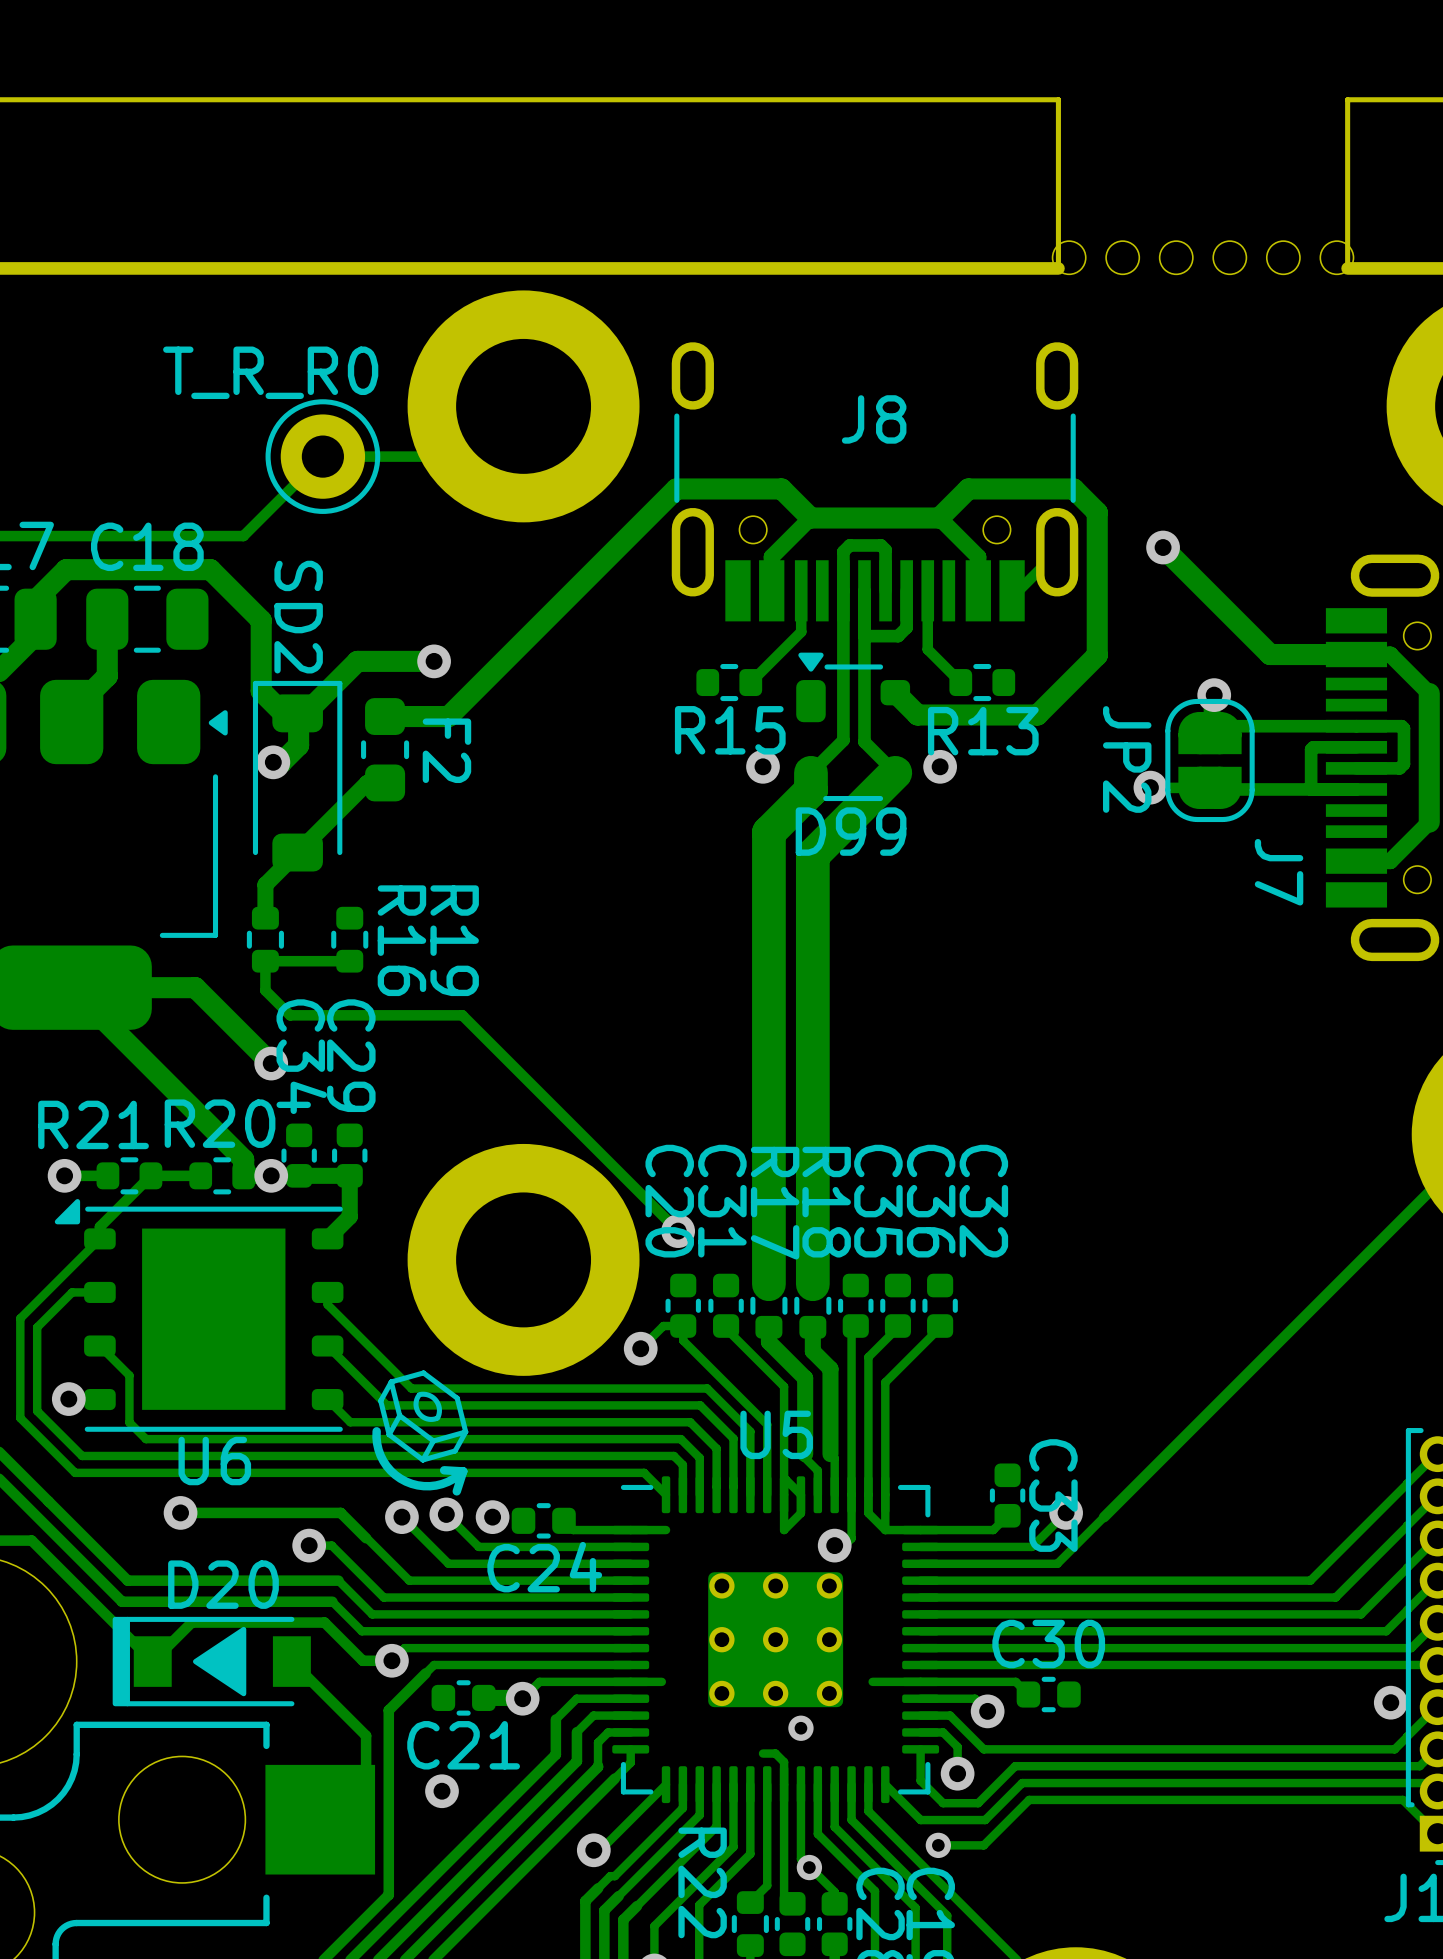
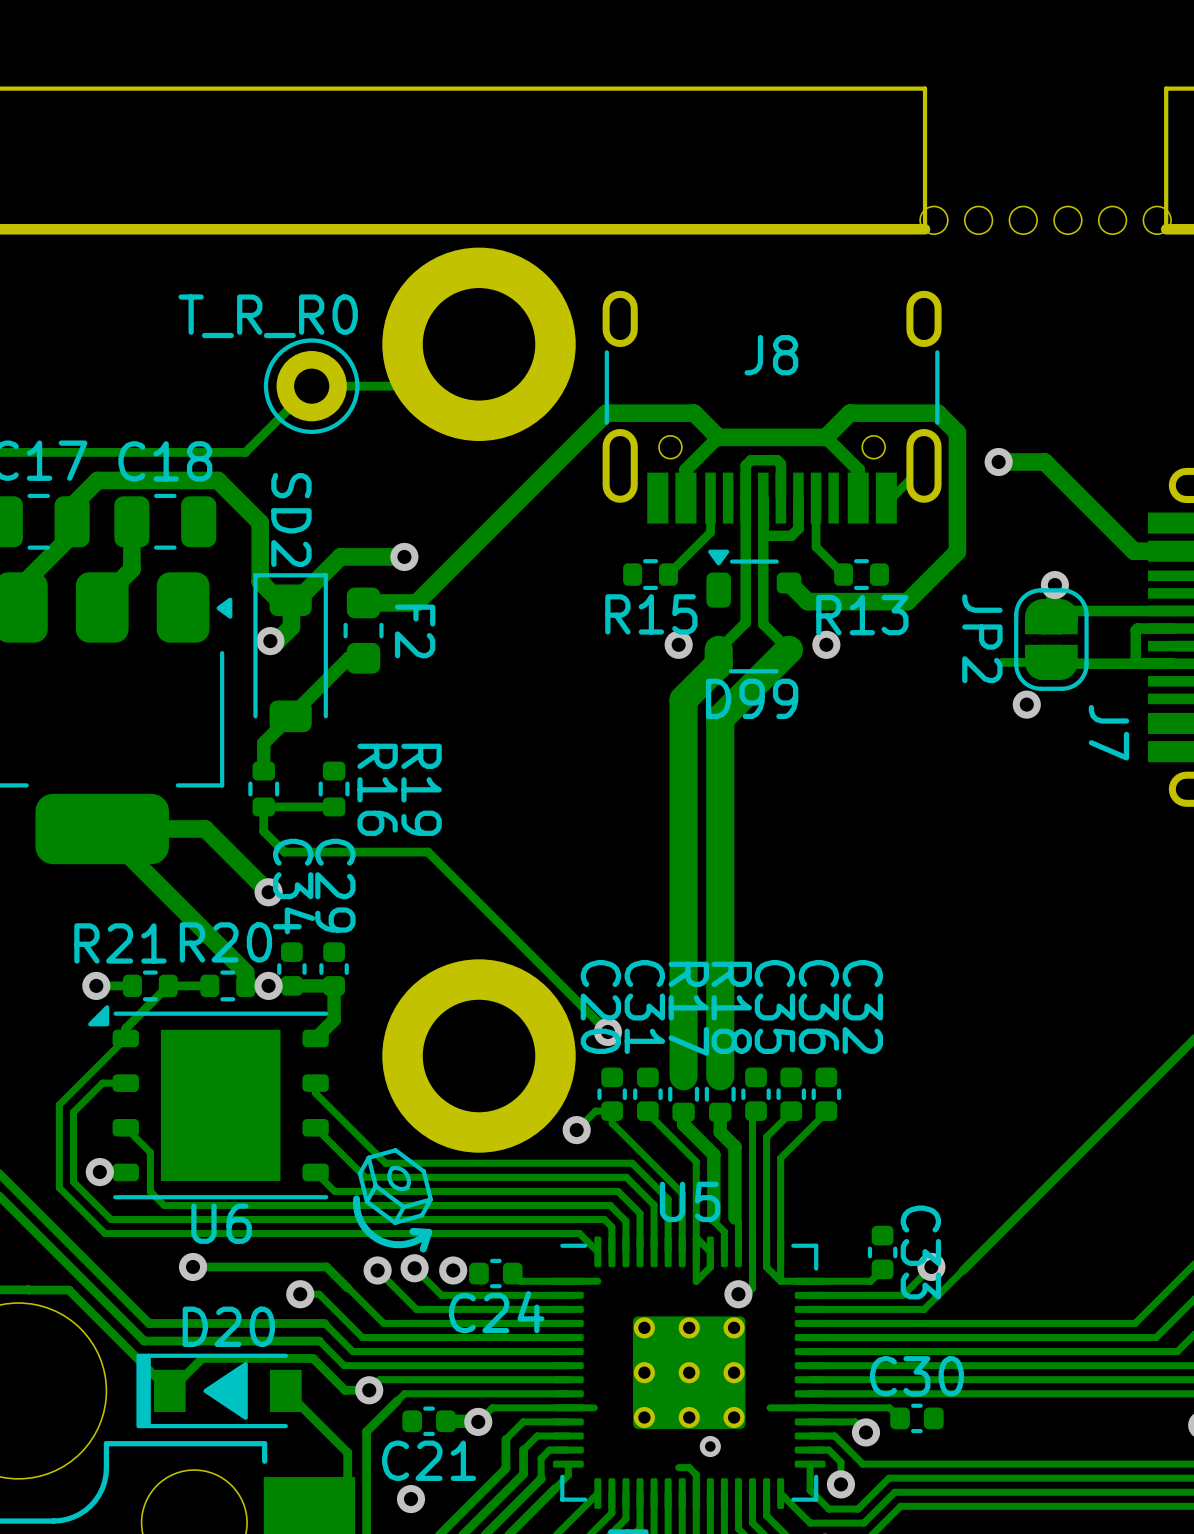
track: (1163, 547) (1270, 654) (1309, 654) -> (998, 461) (1044, 461) (1133, 551)
via position: (1163, 547) -> (998, 461)
via position: (1150, 787) -> (1026, 704)

